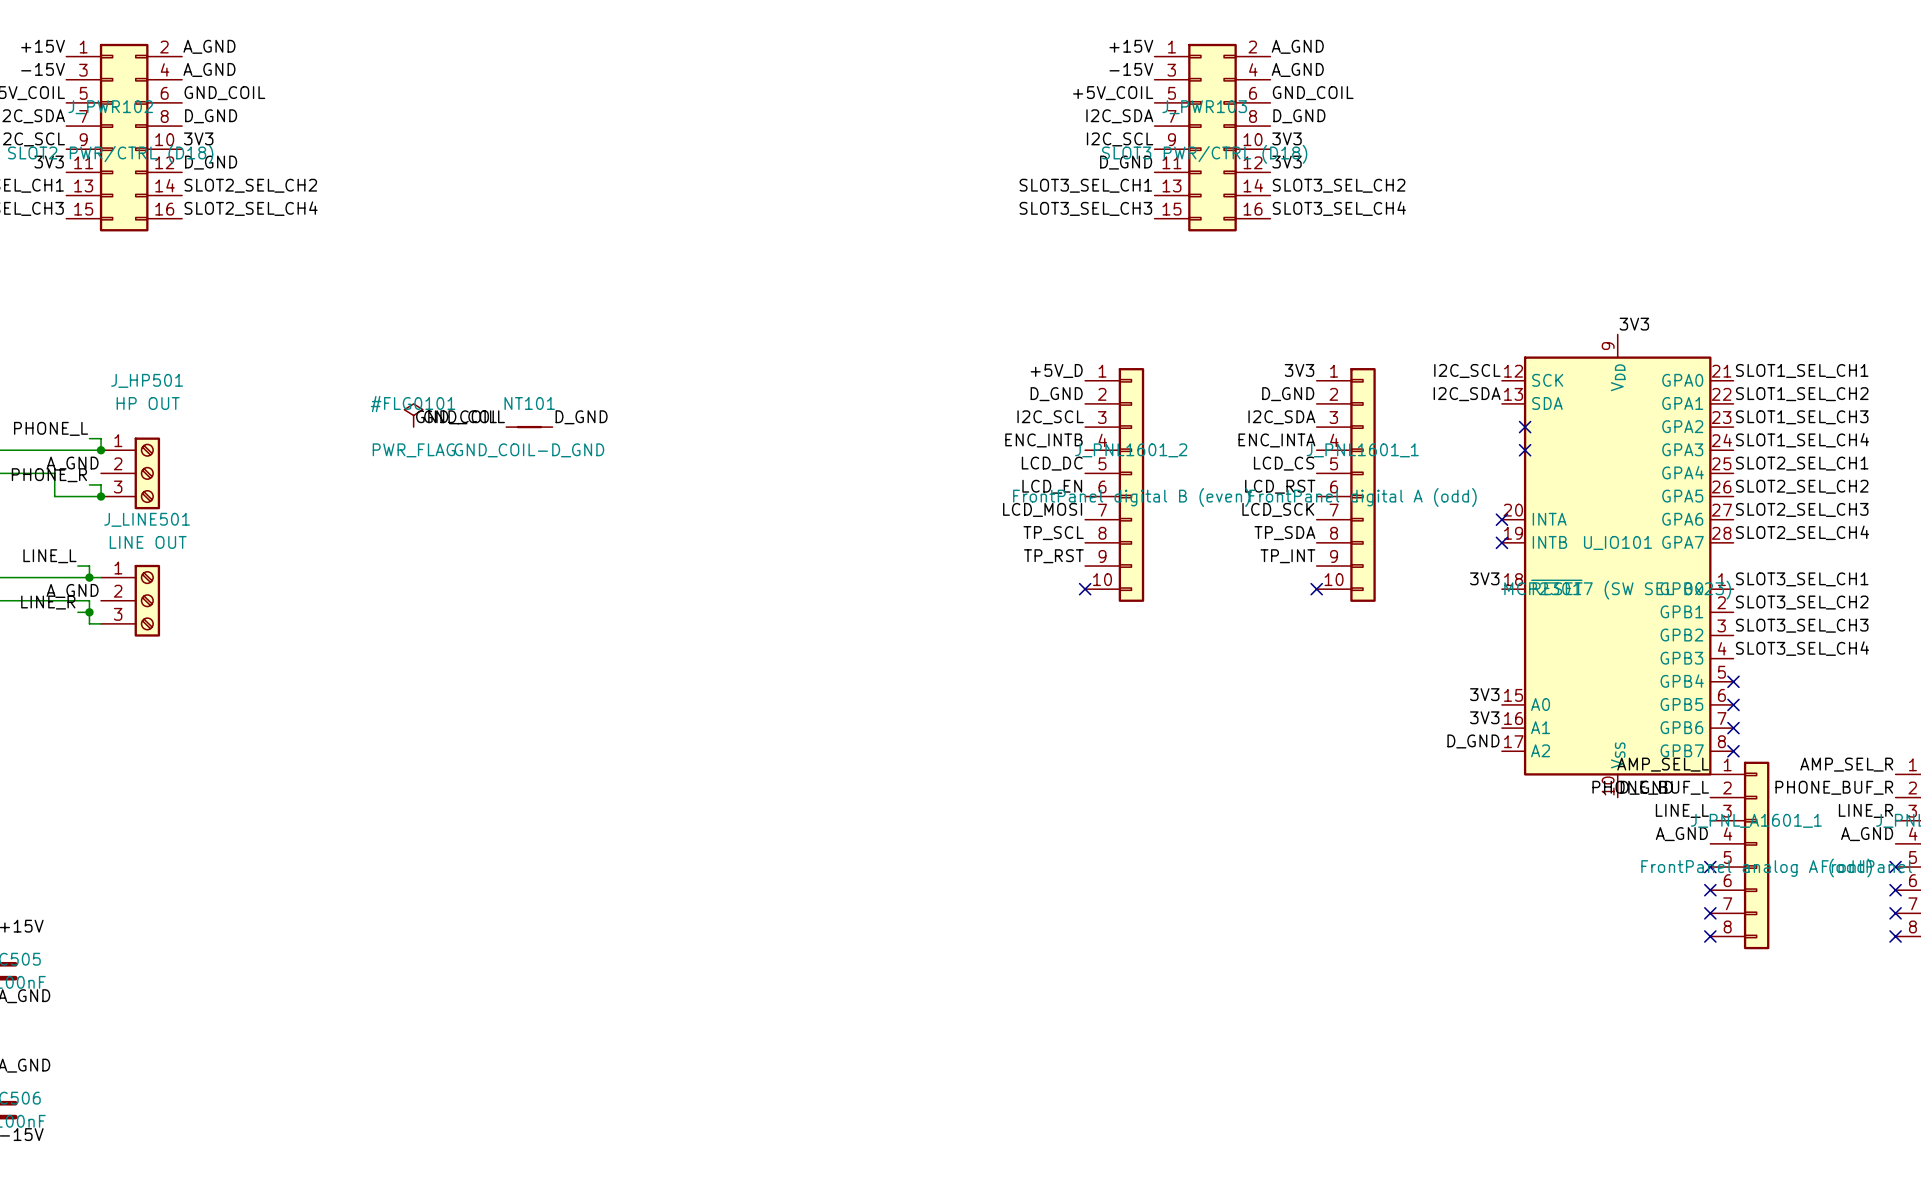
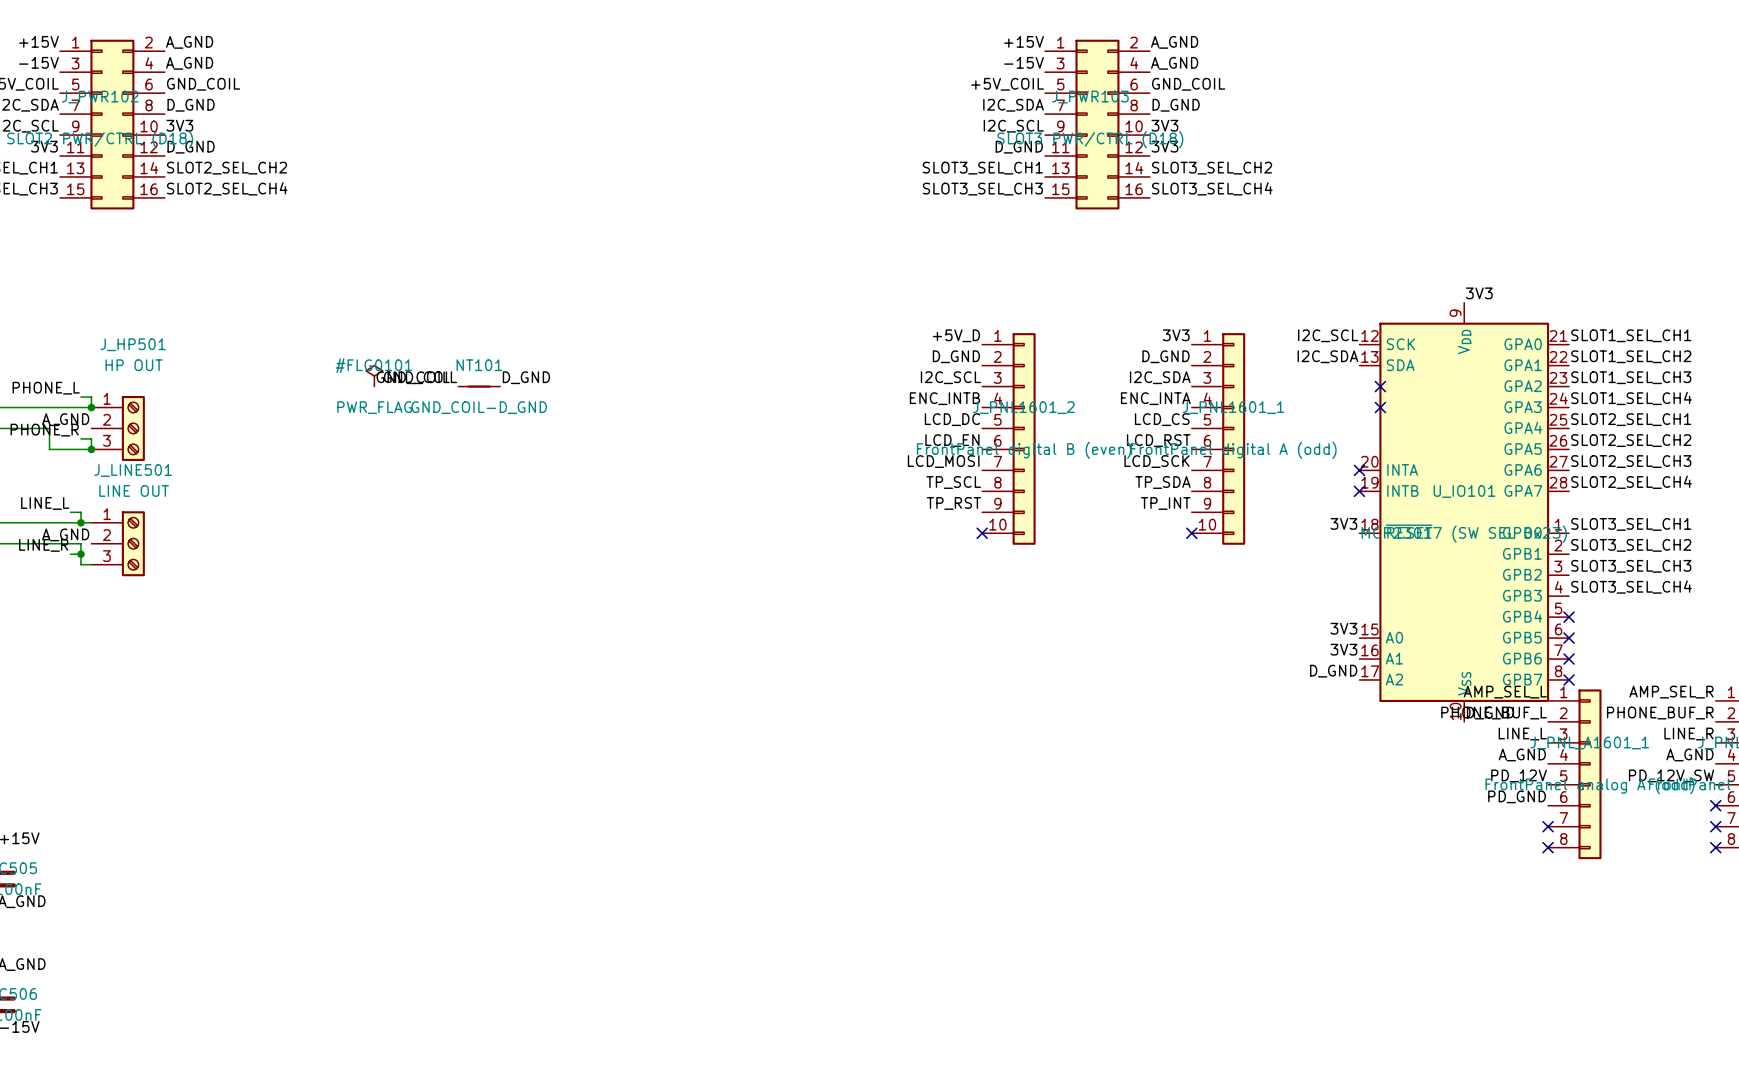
label: none -> PD_12V (1519, 775)
label: none -> PD_12V_SW (1671, 775)
no-connect mark: (1710, 867) -> none
no-connect mark: (1895, 867) -> none
label: none -> PD_GND (1517, 796)
no-connect mark: (1710, 890) -> none

